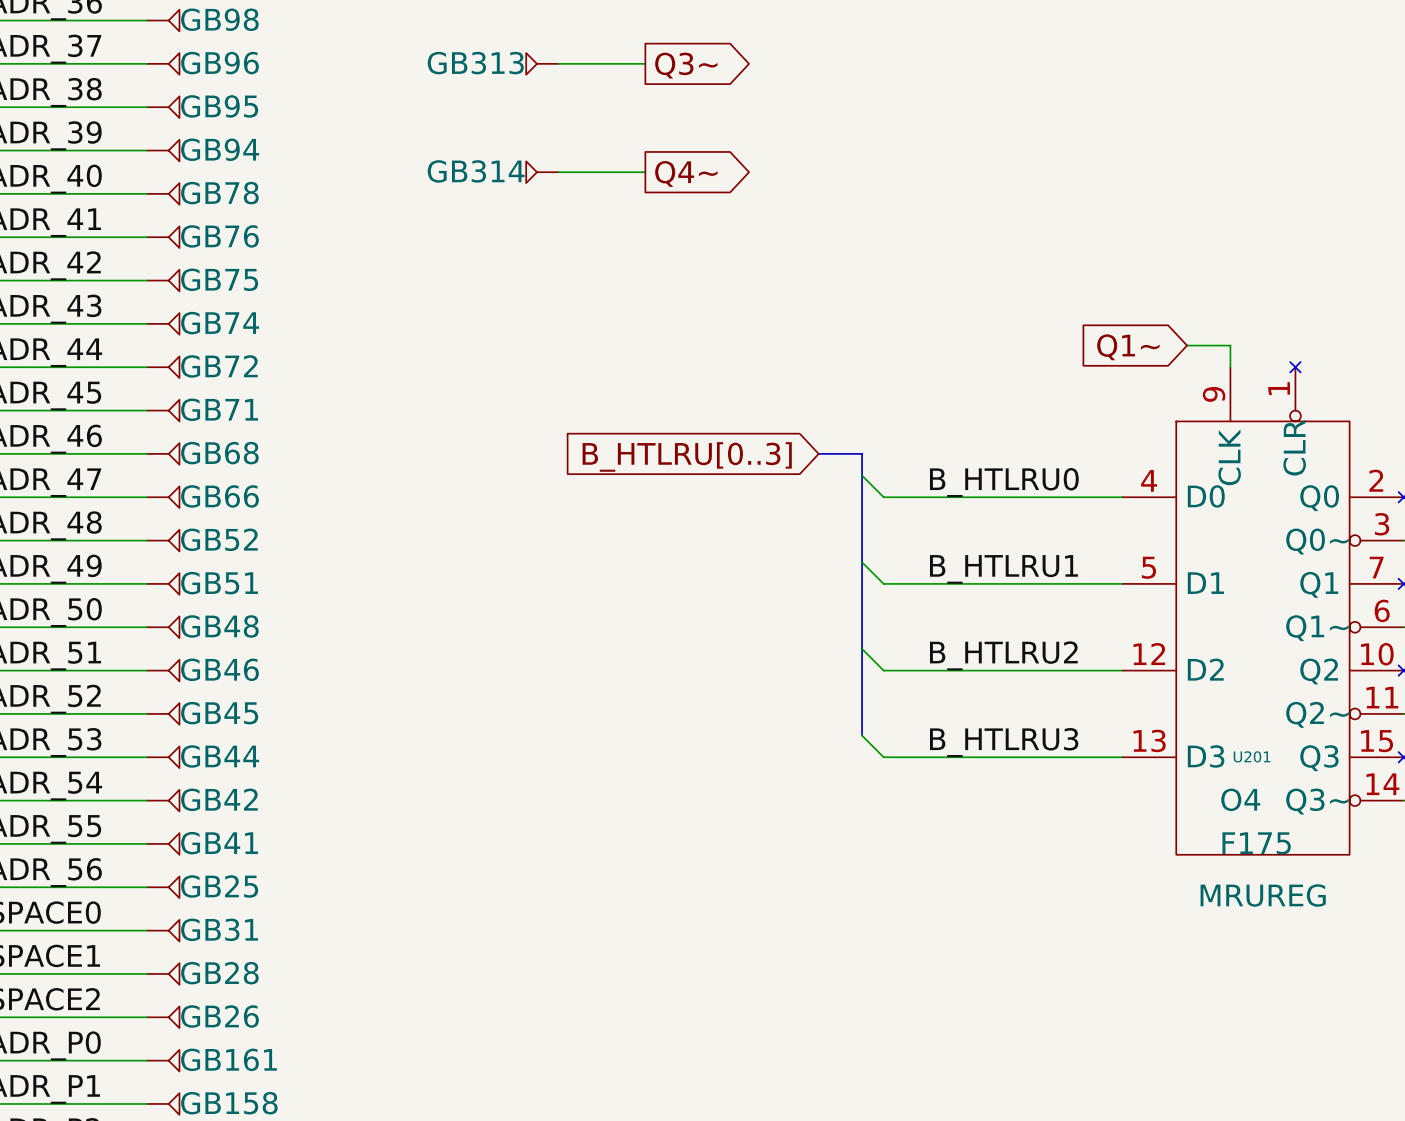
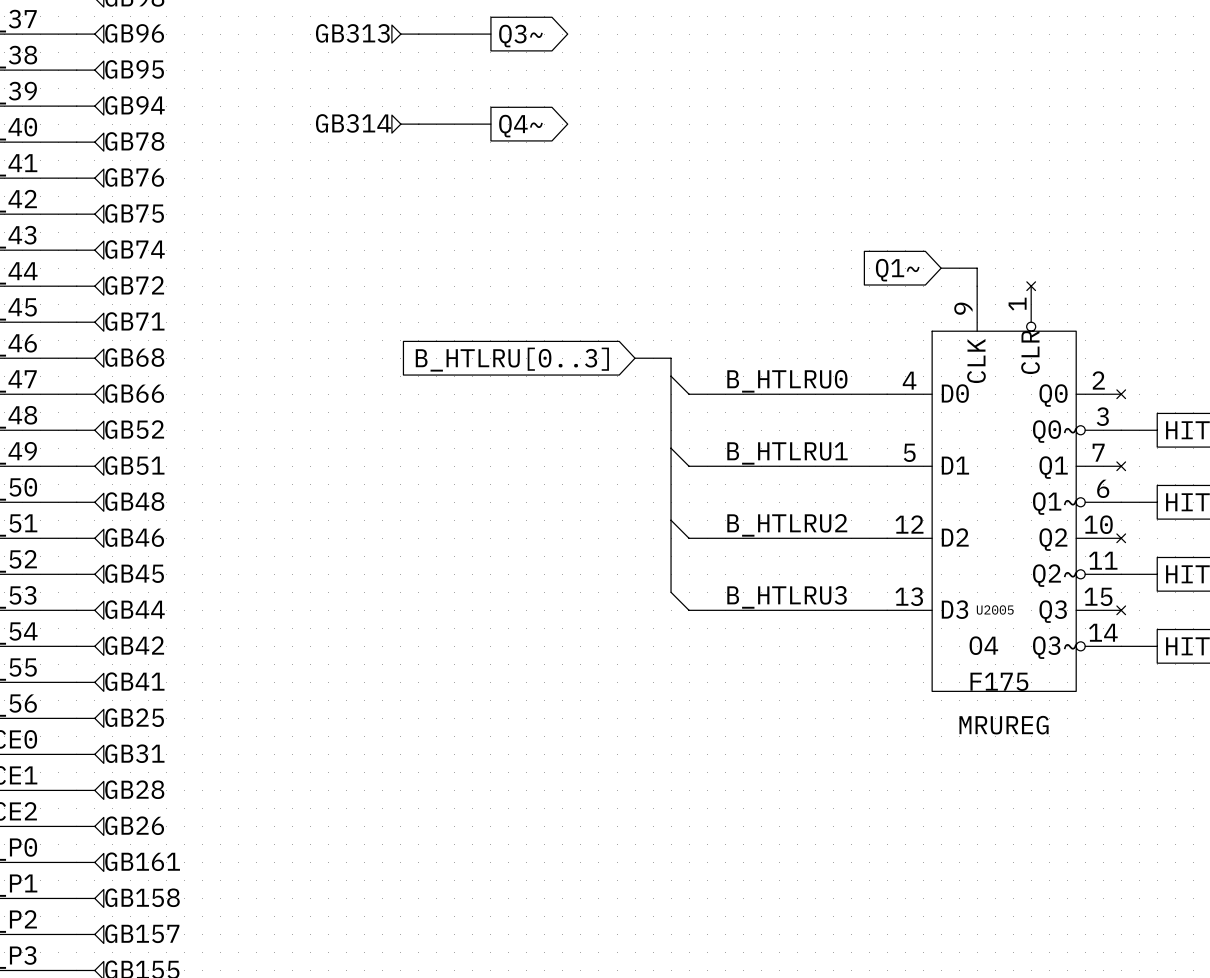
U201 name: U201 (1252, 756) -> U2005 (995, 609)

